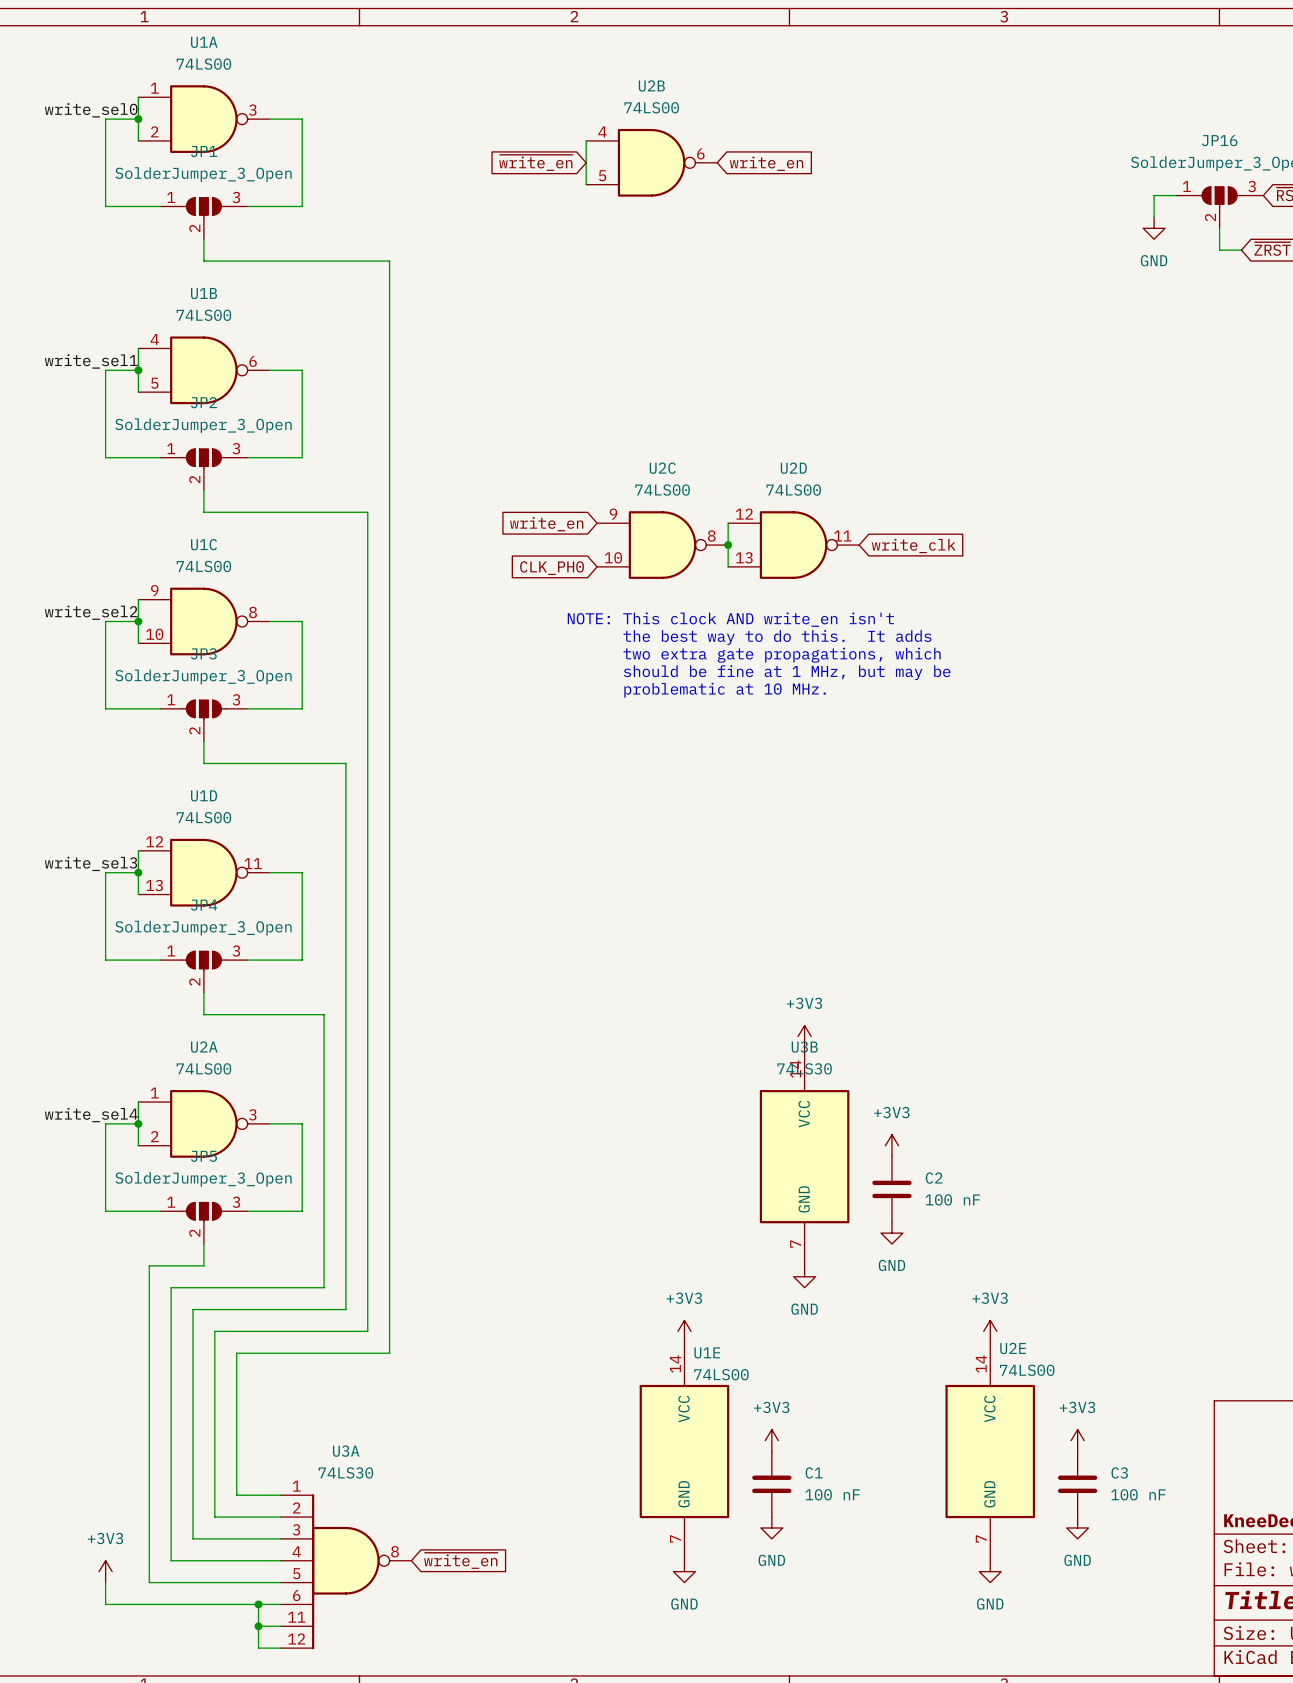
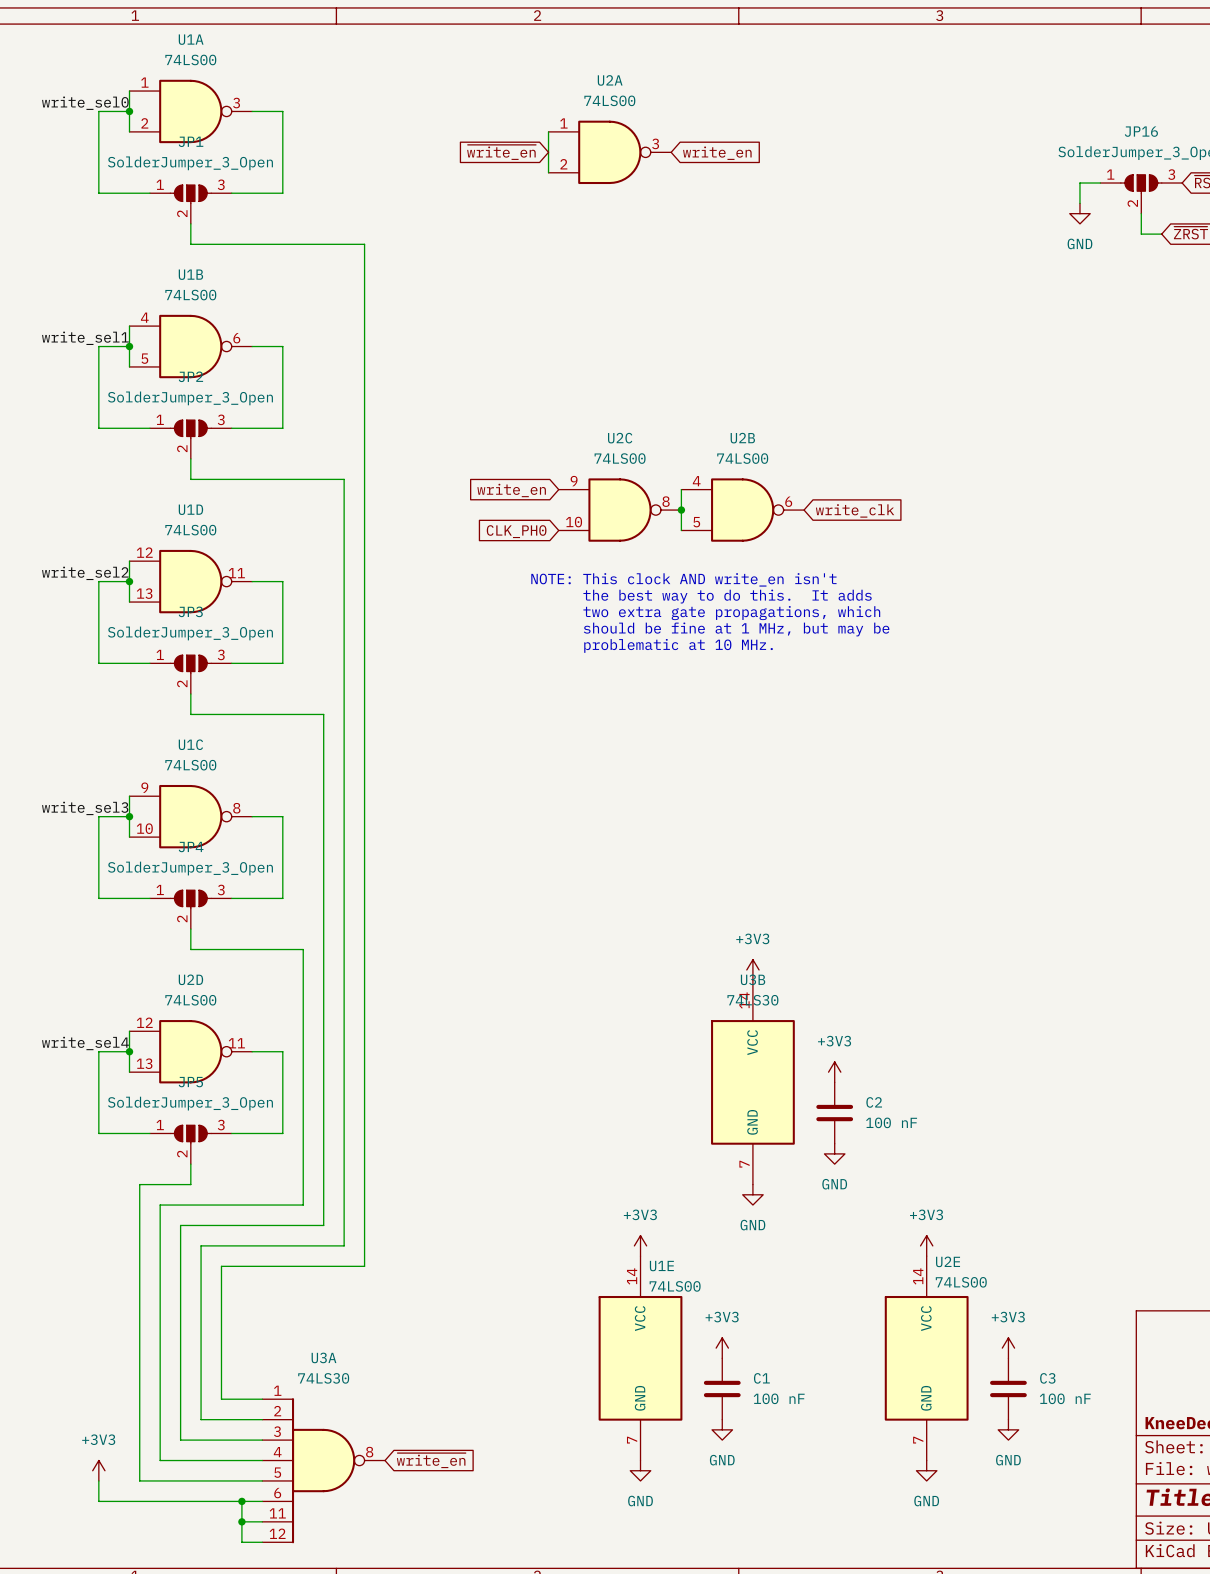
U2B position: (651, 162) -> (742, 510)
U2D position: (793, 545) -> (190, 1051)
U1C position: (203, 621) -> (190, 816)
U1D position: (203, 872) -> (190, 581)
U2A position: (203, 1123) -> (609, 152)

